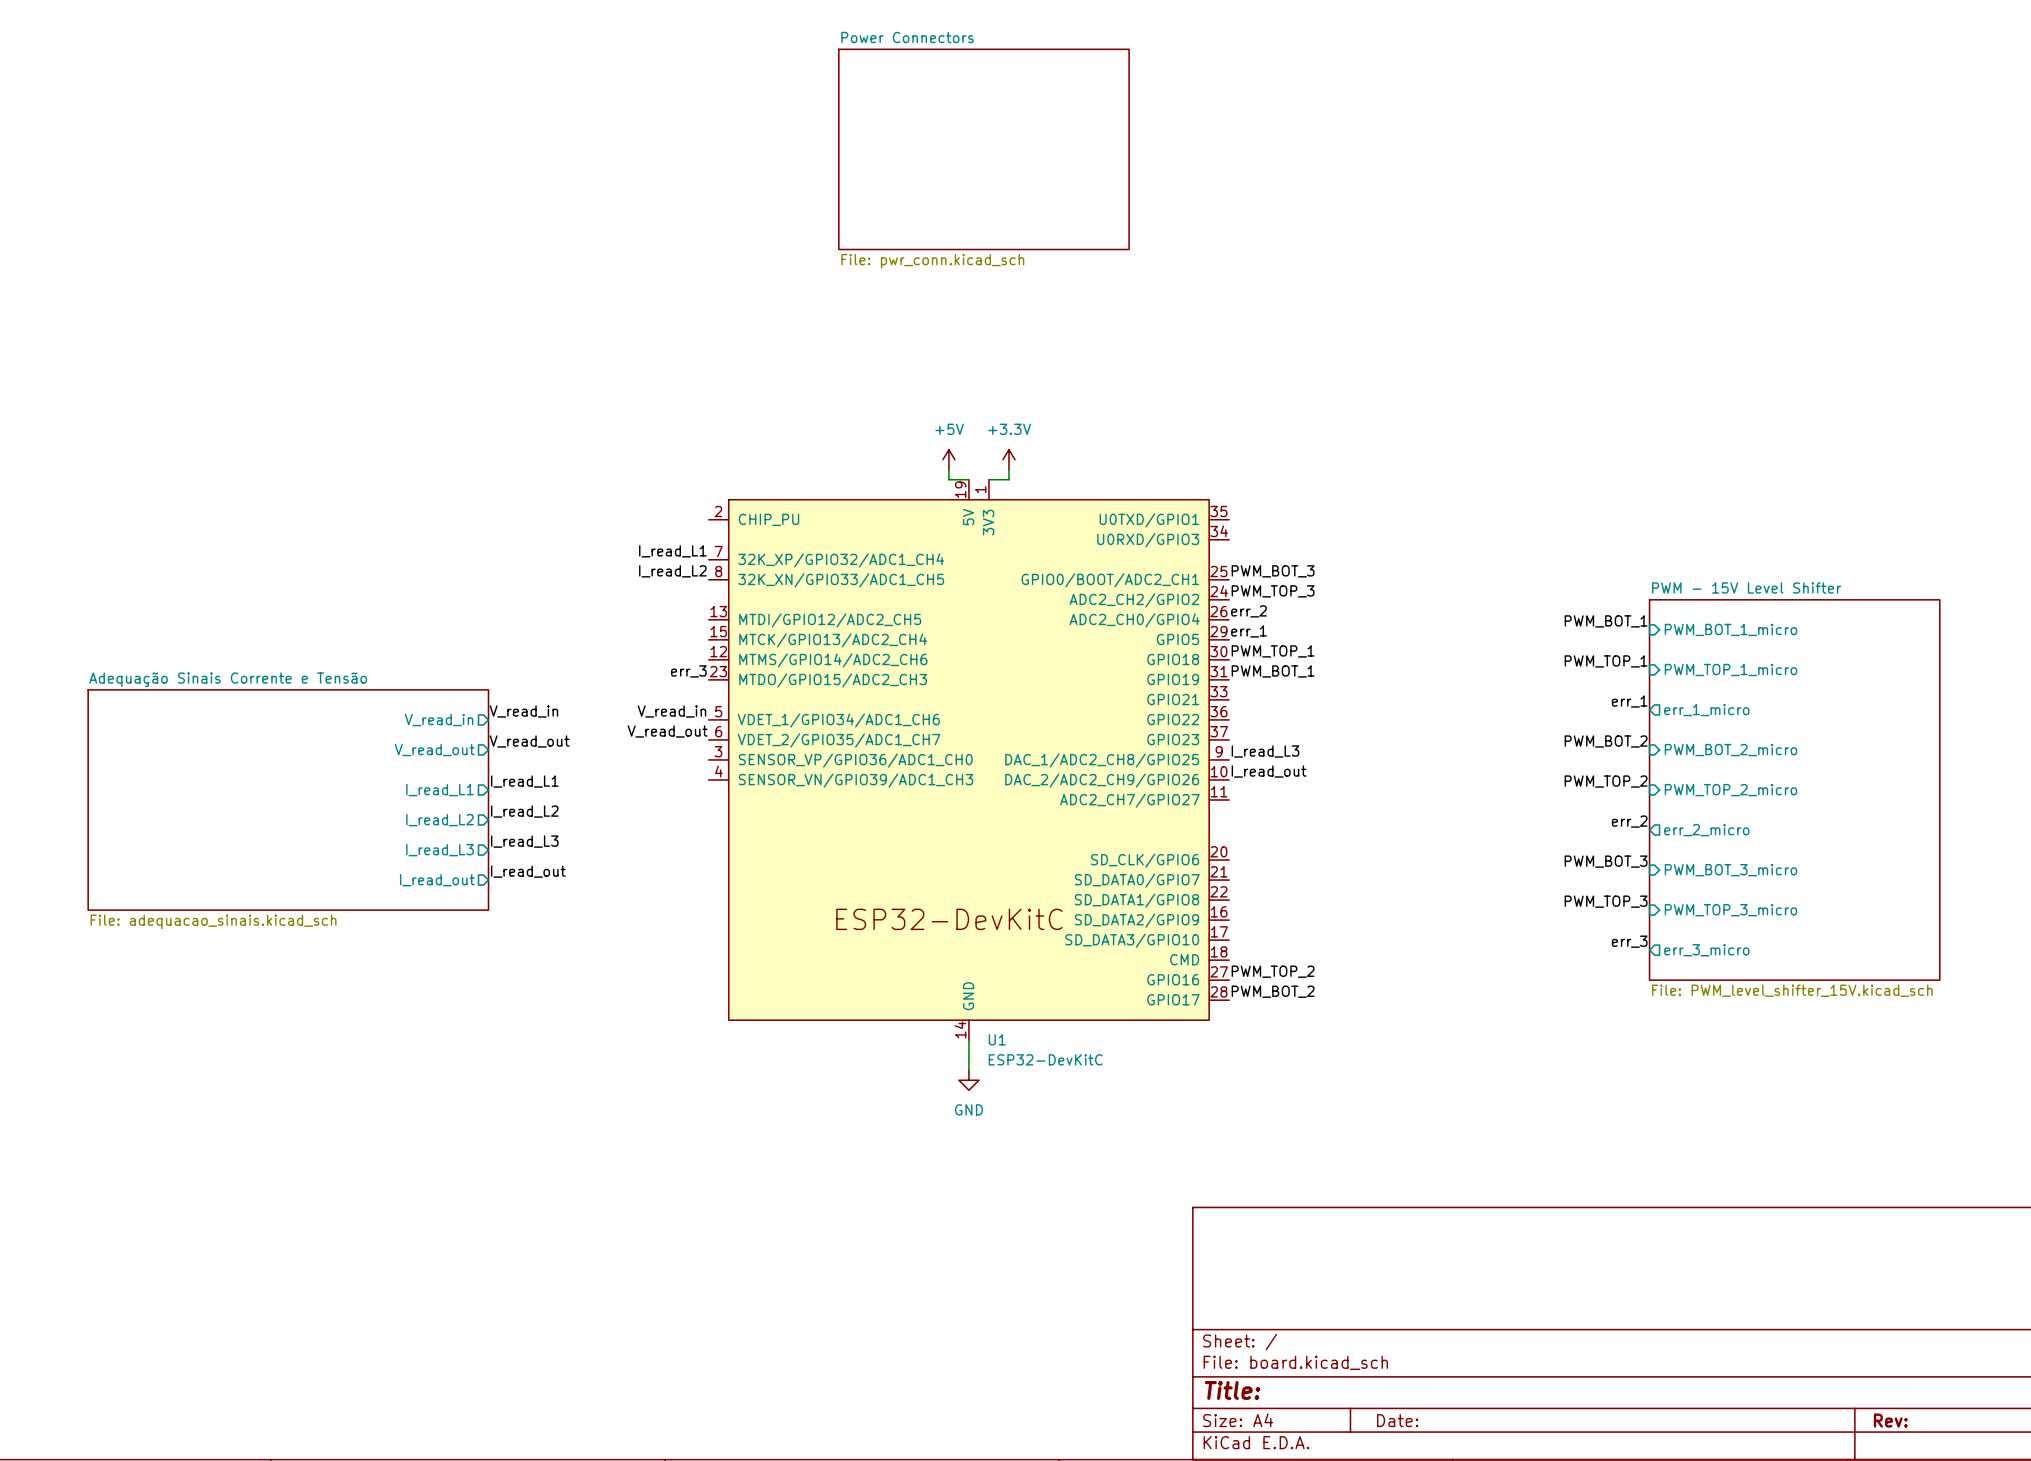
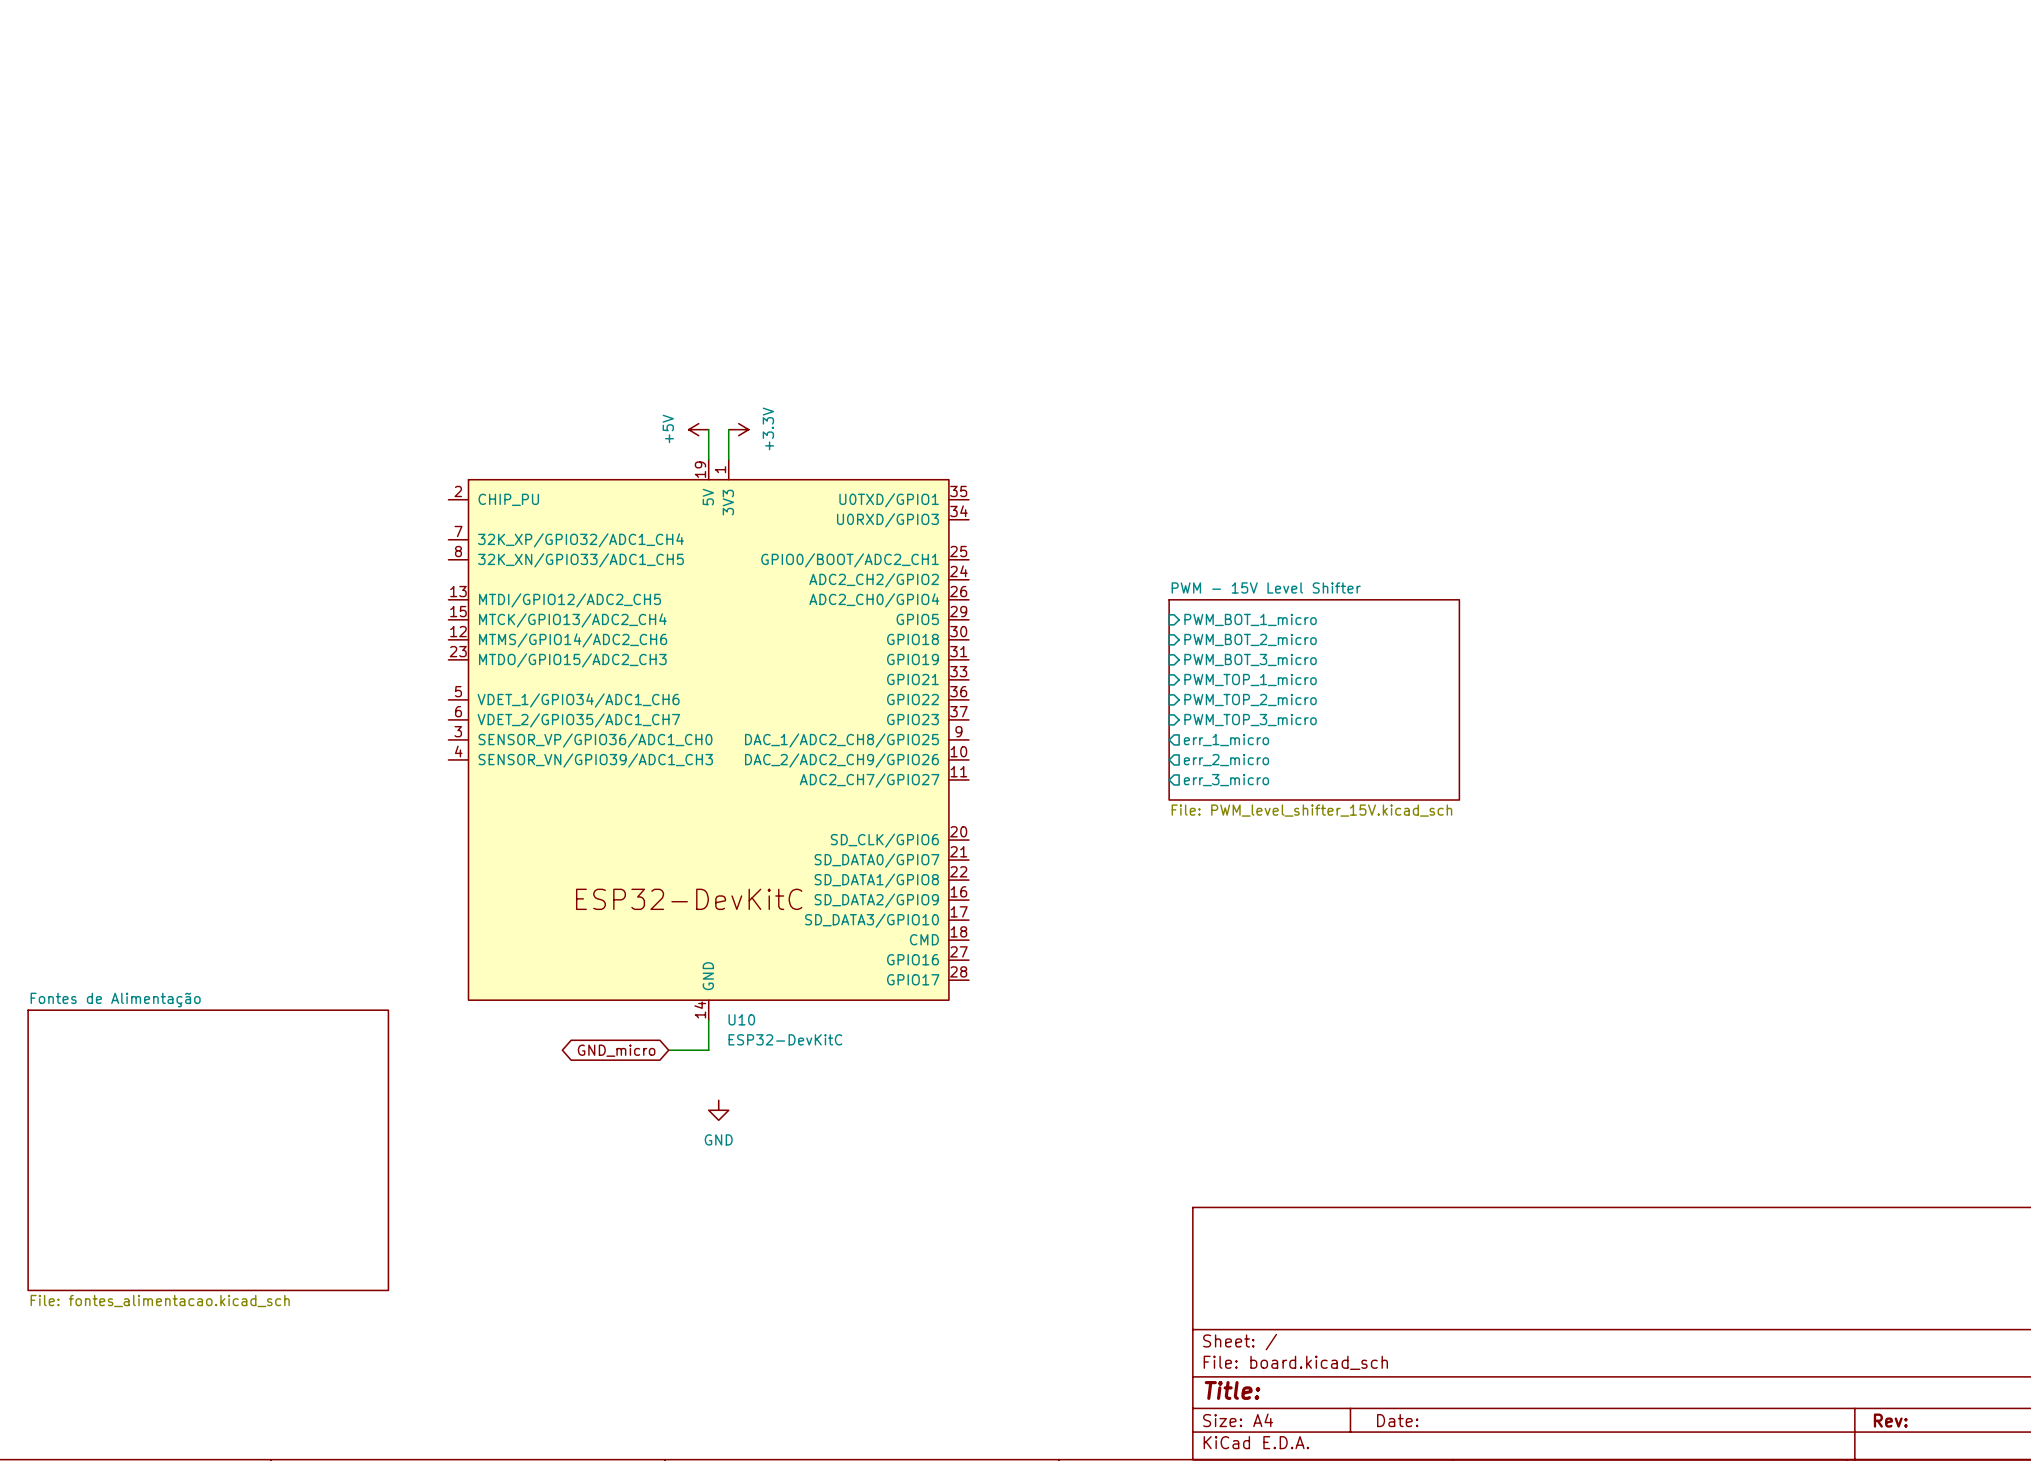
sheet Power Connectors: File: pwr_conn.kicad_sch (983, 149) -> none
power symbol: none -> +5V (698, 429)
wire: none -> (708, 429) (708, 459)
wire: none -> (728, 429) (728, 459)
power symbol: none -> +3.3V (738, 429)
power symbol: +5V (948, 459) -> none
power symbol: +3.3V (1008, 459) -> none
wire: (948, 469) (948, 479) (968, 479) -> none
wire: (1008, 469) (1008, 479) (988, 479) -> none
label: I_read_L1 (672, 551) -> none
label: I_read_L2 (672, 571) -> none
label: PWM_BOT_3 (1273, 571) -> none
sheet PWM - 15V Level Shifter name position: PWM - 15V Level Shifter (1746, 587) -> PWM - 15V Level Shifter (1266, 587)
label: PWM_TOP_3 (1273, 591) -> none
sheet PWM - 15V Level Shifter shape: [1648, 599, 1941, 981] -> [1168, 599, 1460, 801]
label: err_2 (1249, 611) -> none
sheet pin: none -> PWM_BOT_1_micro (1250, 619)
label: PWM_BOT_1 (1606, 621) -> none
sheet pin: PWM_BOT_1_micro (1730, 629) -> none
label: err_1 (1249, 631) -> none
sheet pin: none -> PWM_BOT_2_micro (1250, 639)
label: PWM_TOP_1 (1273, 651) -> none
sheet pin: none -> PWM_BOT_3_micro (1250, 659)
label: PWM_TOP_1 (1606, 661) -> none
sheet pin: PWM_TOP_1_micro (1730, 669) -> none
label: err_3 (688, 671) -> none
label: PWM_BOT_1 (1273, 671) -> none
sheet pin: none -> PWM_TOP_1_micro (1250, 679)
sheet pin: none -> PWM_TOP_2_micro (1250, 700)
label: err_1 (1629, 701) -> none
sheet pin: err_1_micro (1706, 710) -> none
label: V_read_in (523, 711) -> none
label: V_read_in (671, 711) -> none
sheet pin: V_read_in (439, 720) -> none
sheet pin: none -> PWM_TOP_3_micro (1250, 720)
label: V_read_out (667, 731) -> none
U10: none -> ESP32-DevKitC (708, 739)
sheet pin: none -> err_1_micro (1226, 740)
label: V_read_out (529, 741) -> none
label: PWM_BOT_2 (1606, 741) -> none
sheet pin: V_read_out (434, 750) -> none
sheet pin: PWM_BOT_2_micro (1730, 750) -> none
label: I_read_L3 (1265, 751) -> none
U1: ESP32-DevKitC (968, 759) -> none
sheet pin: none -> err_2_micro (1226, 760)
label: I_read_out (1269, 771) -> none
sheet pin: none -> err_3_micro (1226, 780)
label: I_read_L1 (524, 781) -> none
label: PWM_TOP_2 (1606, 781) -> none
sheet pin: I_read_L1 (439, 790) -> none
sheet pin: PWM_TOP_2_micro (1730, 790) -> none
sheet Adequação Sinais Corrente e Tensão: File: adequacao_sinais.kicad_sch (288, 800) -> none
label: I_read_L2 (524, 811) -> none
sheet pin: I_read_L2 (439, 820) -> none
label: err_2 (1629, 821) -> none
sheet pin: err_2_micro (1706, 830) -> none
label: I_read_L3 (524, 841) -> none
sheet pin: I_read_L3 (439, 850) -> none
label: PWM_BOT_3 (1606, 861) -> none
sheet pin: PWM_BOT_3_micro (1730, 870) -> none
label: I_read_out (528, 871) -> none
sheet pin: I_read_out (437, 880) -> none
label: PWM_TOP_3 (1606, 901) -> none
sheet pin: PWM_TOP_3_micro (1730, 910) -> none
label: err_3 (1629, 941) -> none
sheet pin: err_3_micro (1706, 950) -> none
label: PWM_TOP_2 (1273, 971) -> none
sheet PWM - 15V Level Shifter value position: File: PWM_level_shifter_15V.kicad_sch (1792, 990) -> File: PWM_level_shifter_15V.kicad_sch (1311, 810)
label: PWM_BOT_2 (1273, 991) -> none
wire: none -> (708, 1020) (708, 1050) (668, 1050)
wire: (968, 1040) (968, 1070) -> none
global label: none -> GND_micro (616, 1050)
power symbol: GND (968, 1080) -> none
power symbol: none -> GND (718, 1110)
sheet Fontes de Alimentação: none -> File: fontes_alimentacao.kicad_sch (208, 1150)

